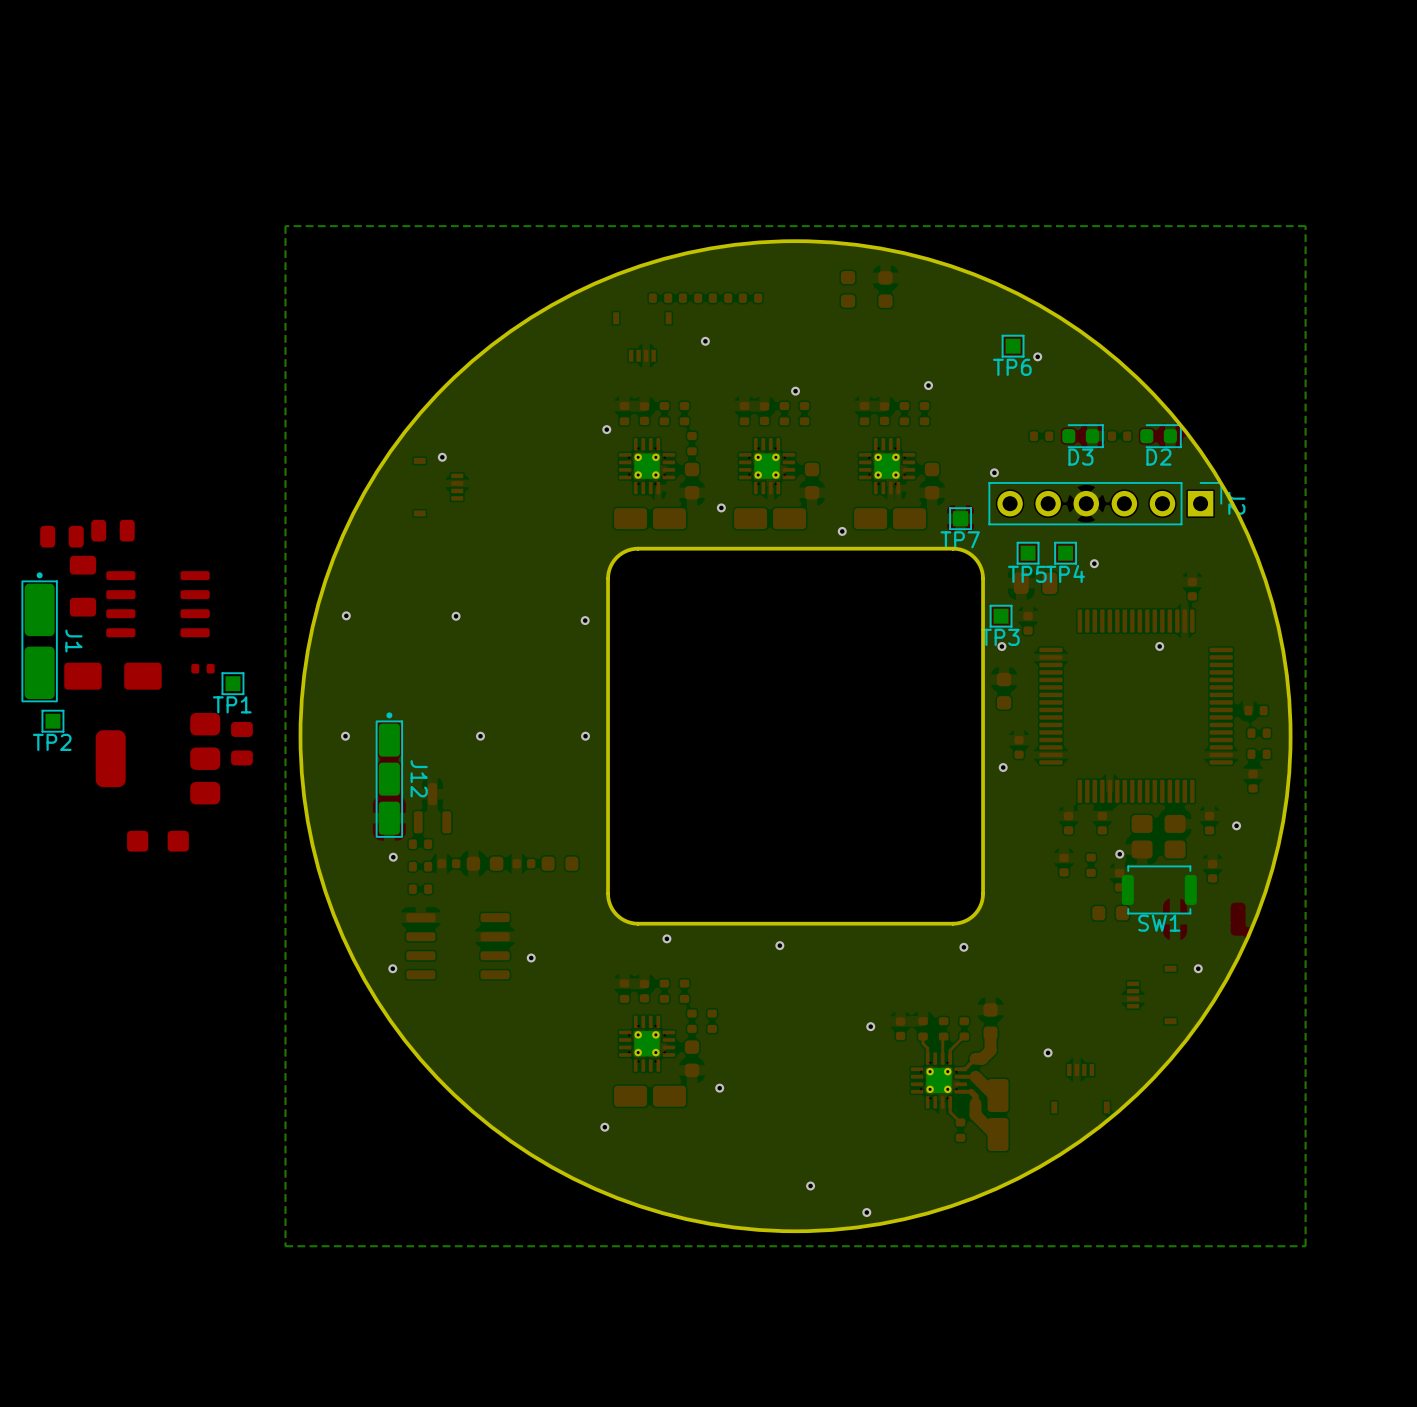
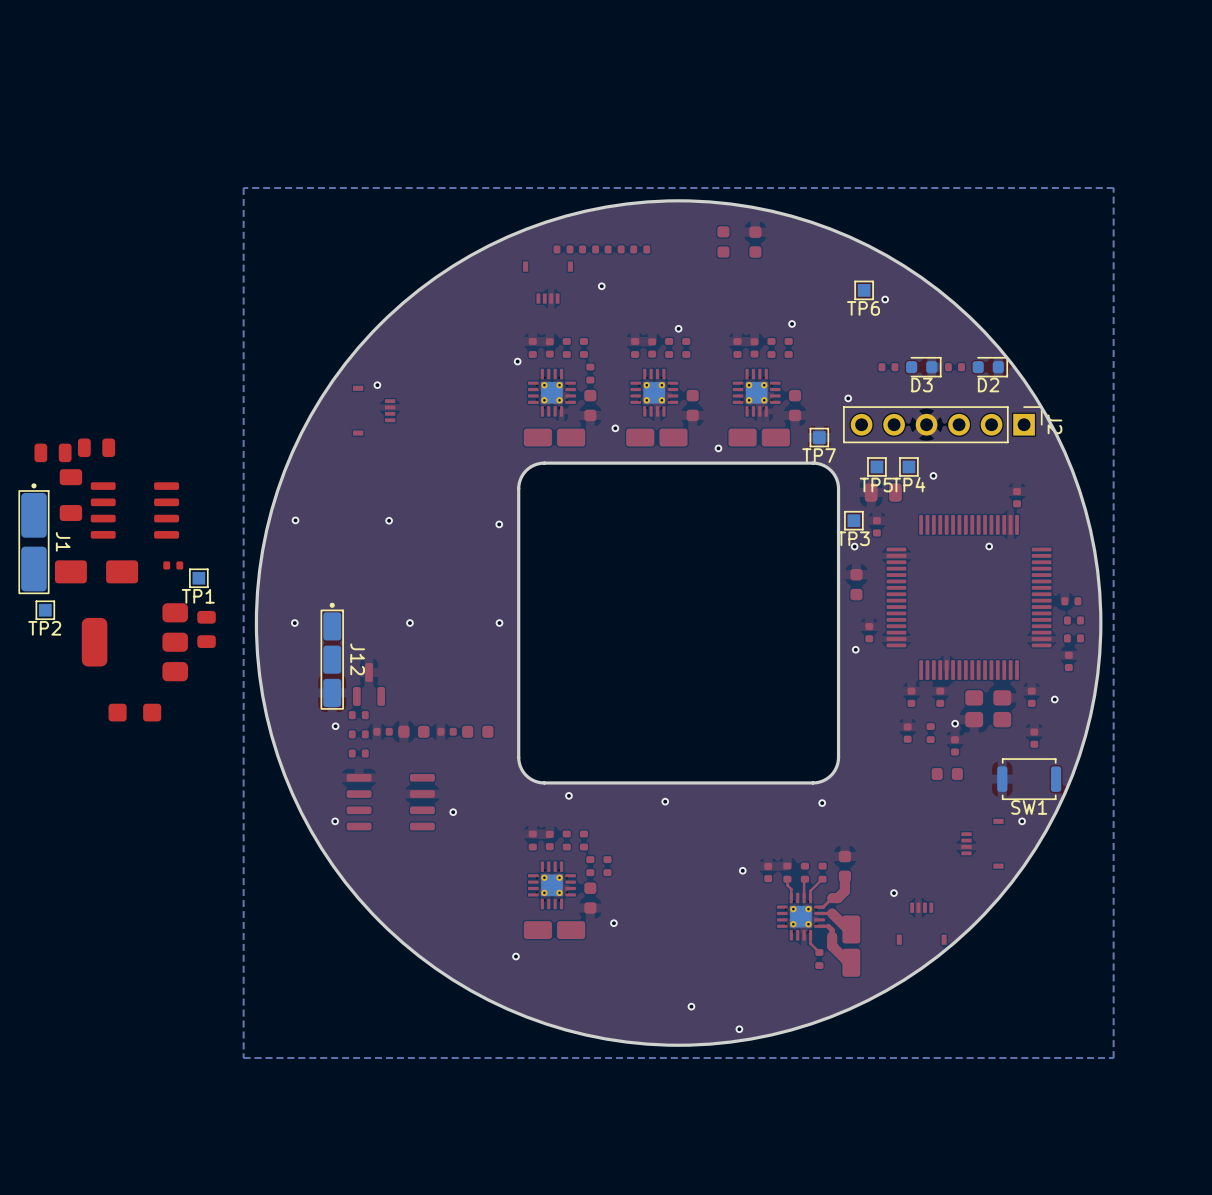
SW1 position: (1159, 889) -> (1029, 779)

